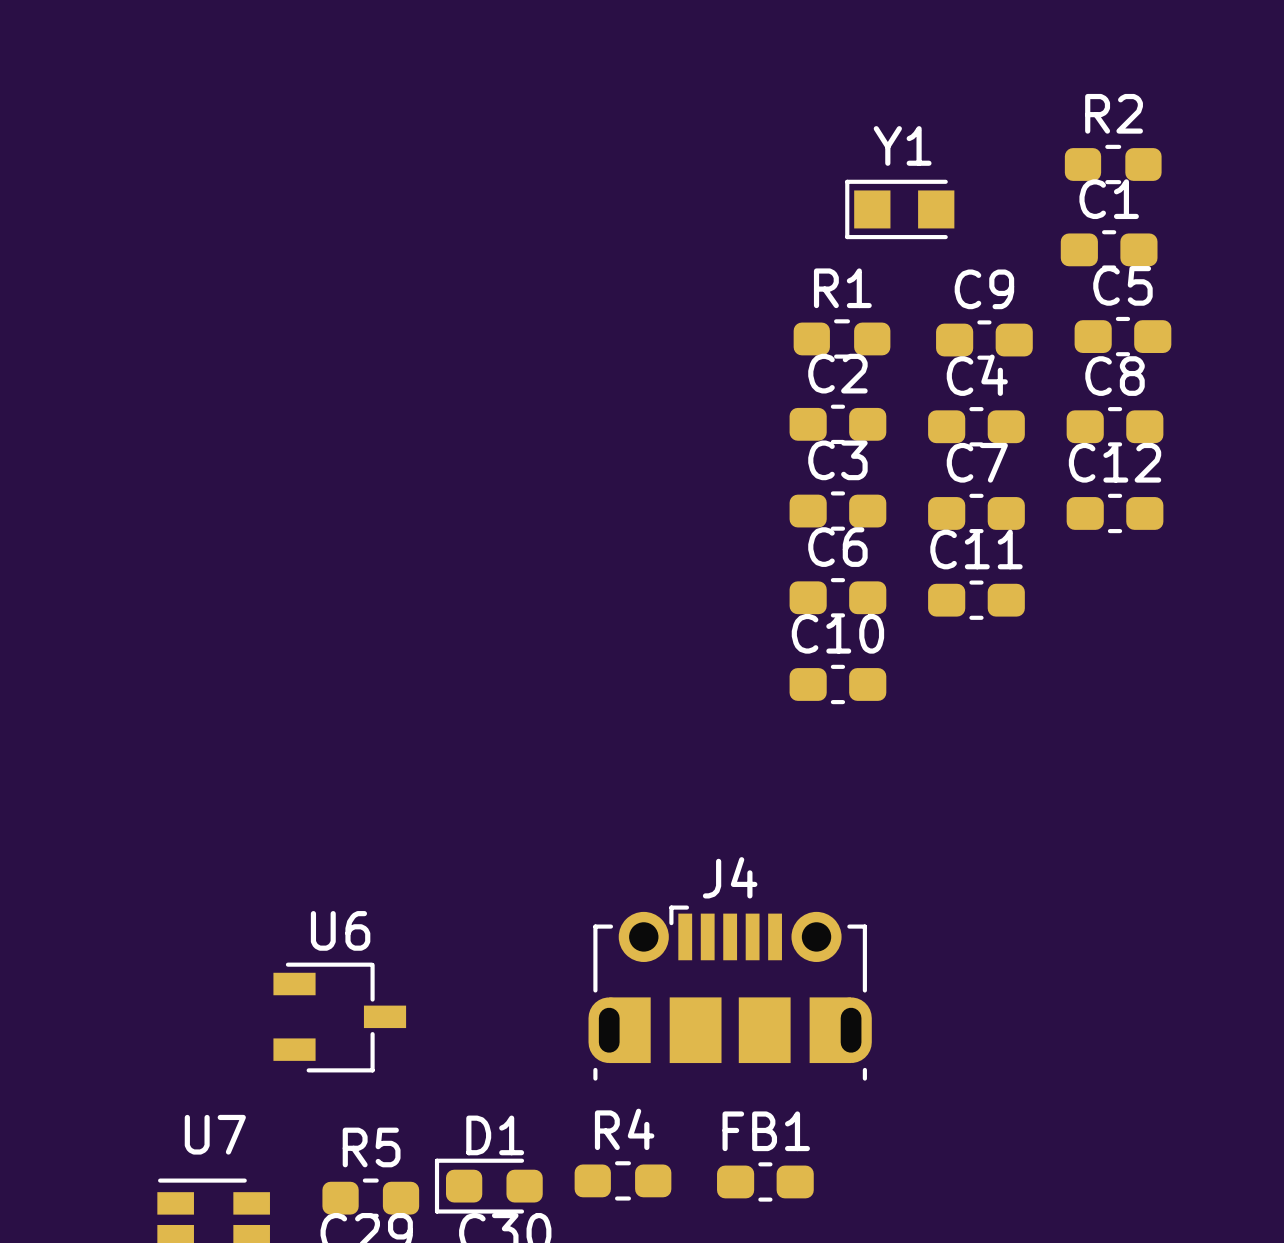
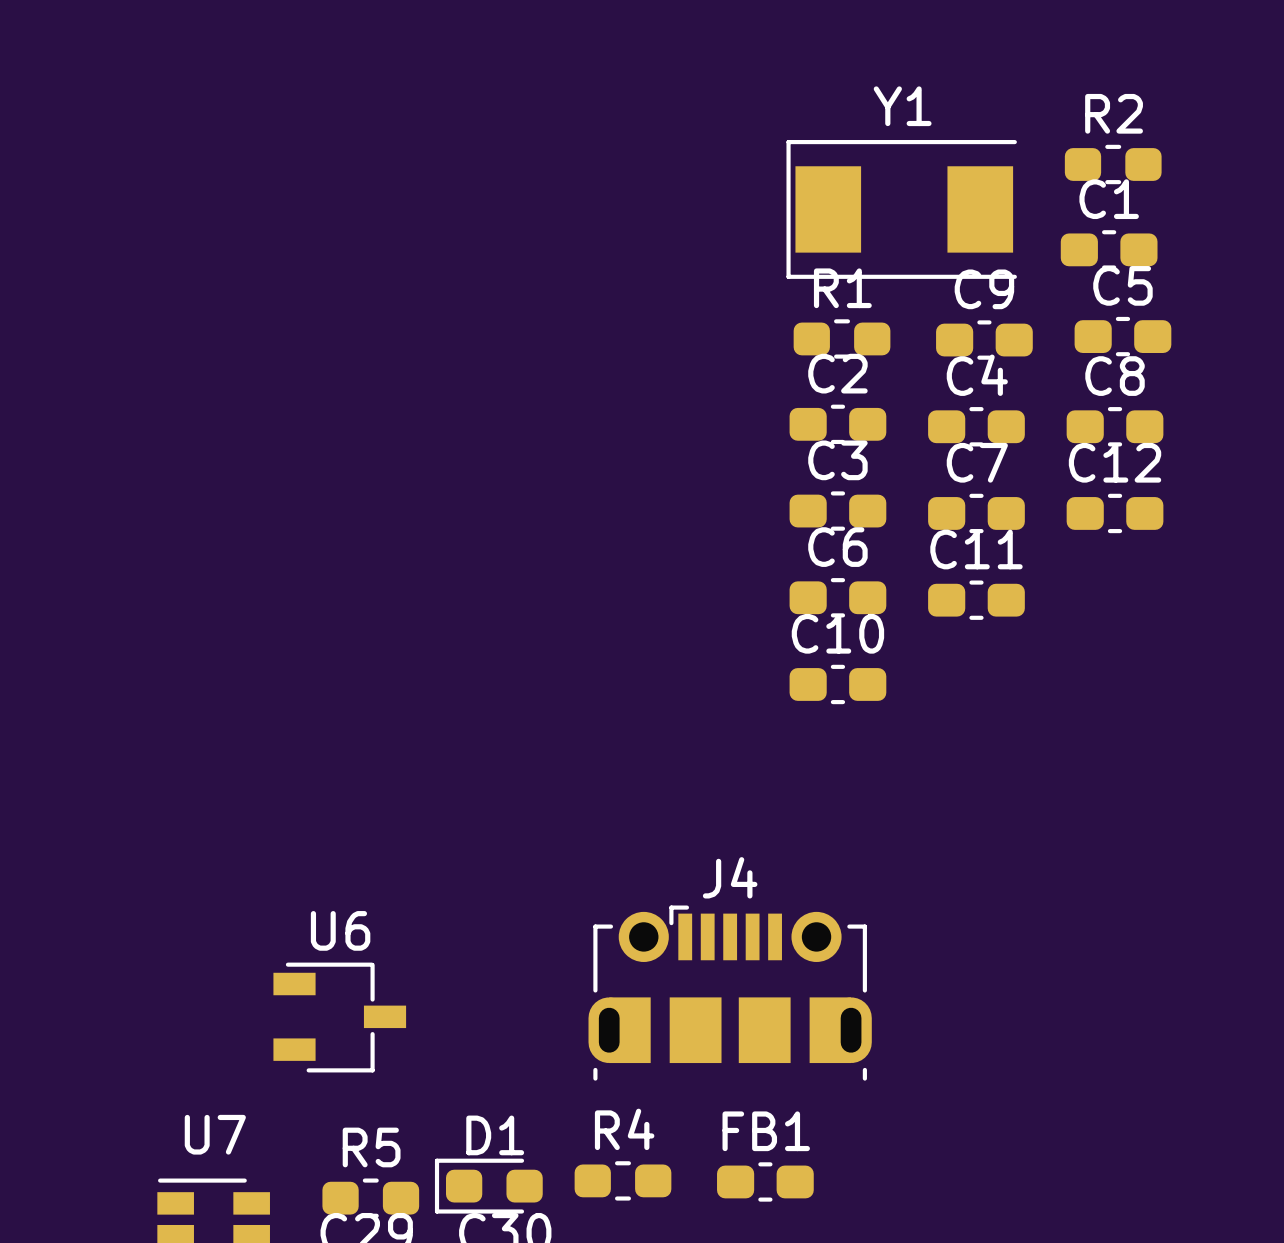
Y1 footprint: [845, 179, 955, 240] -> [786, 140, 1017, 279]

